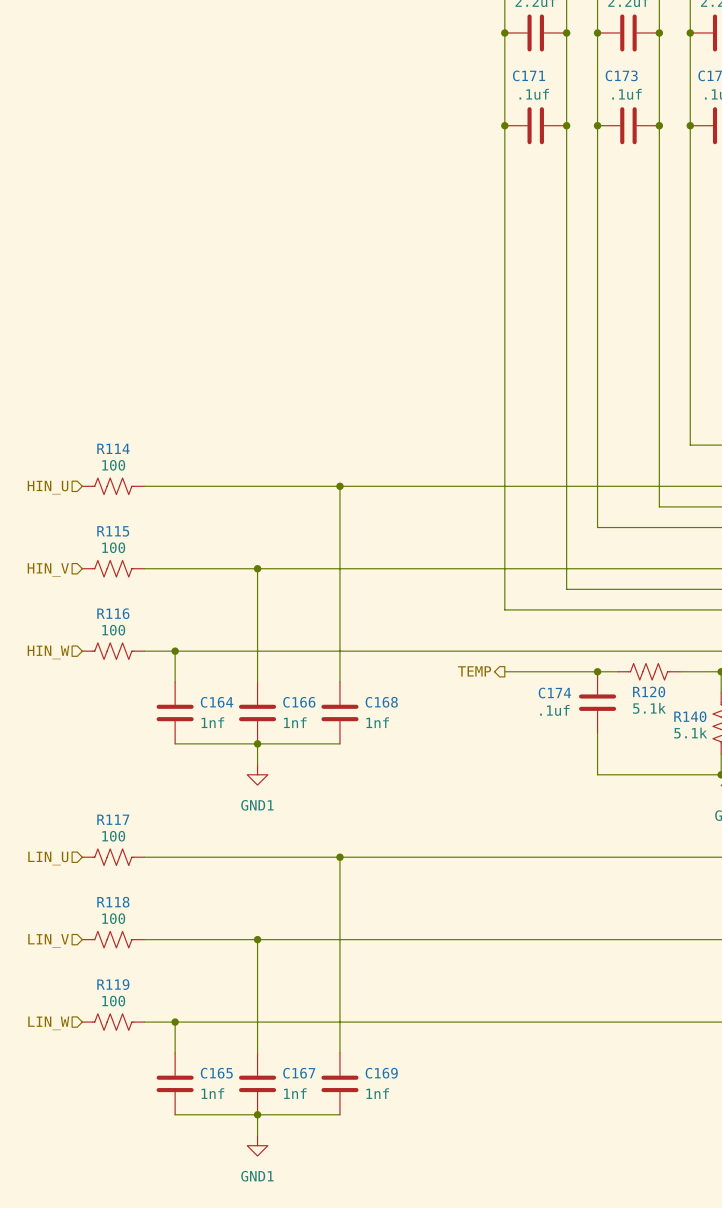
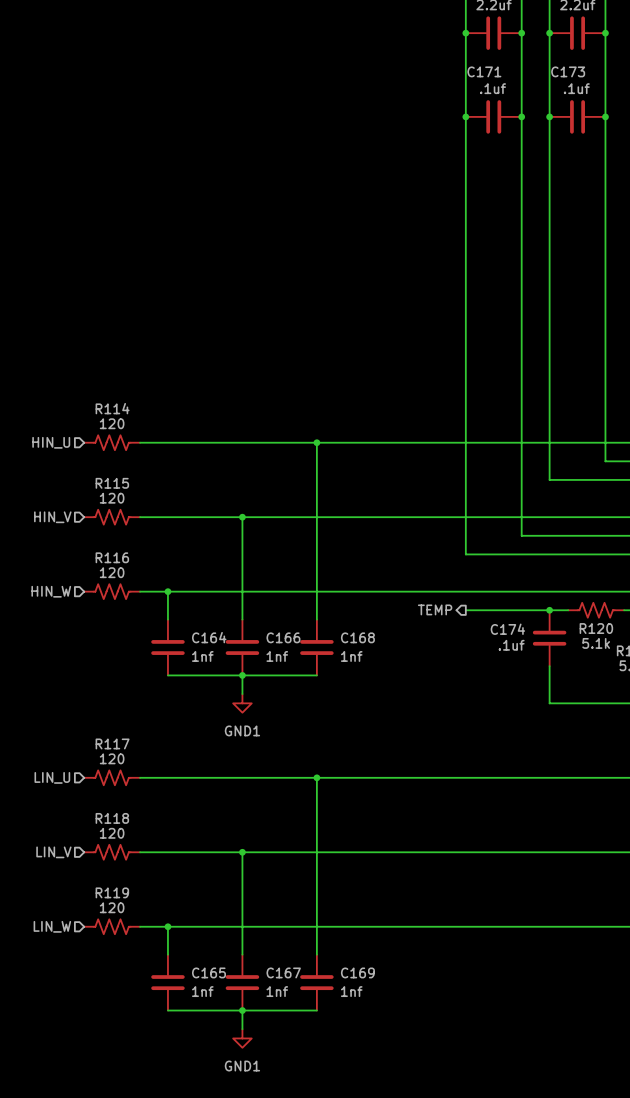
R114 value: 100 (113, 465) -> 120 (112, 423)
R115 value: 100 (113, 547) -> 120 (112, 498)
R116 value: 100 (113, 630) -> 120 (112, 572)
R117 value: 100 (113, 836) -> 120 (112, 758)
R118 value: 100 (113, 918) -> 120 (112, 833)
R119 value: 100 (113, 1001) -> 120 (112, 907)

